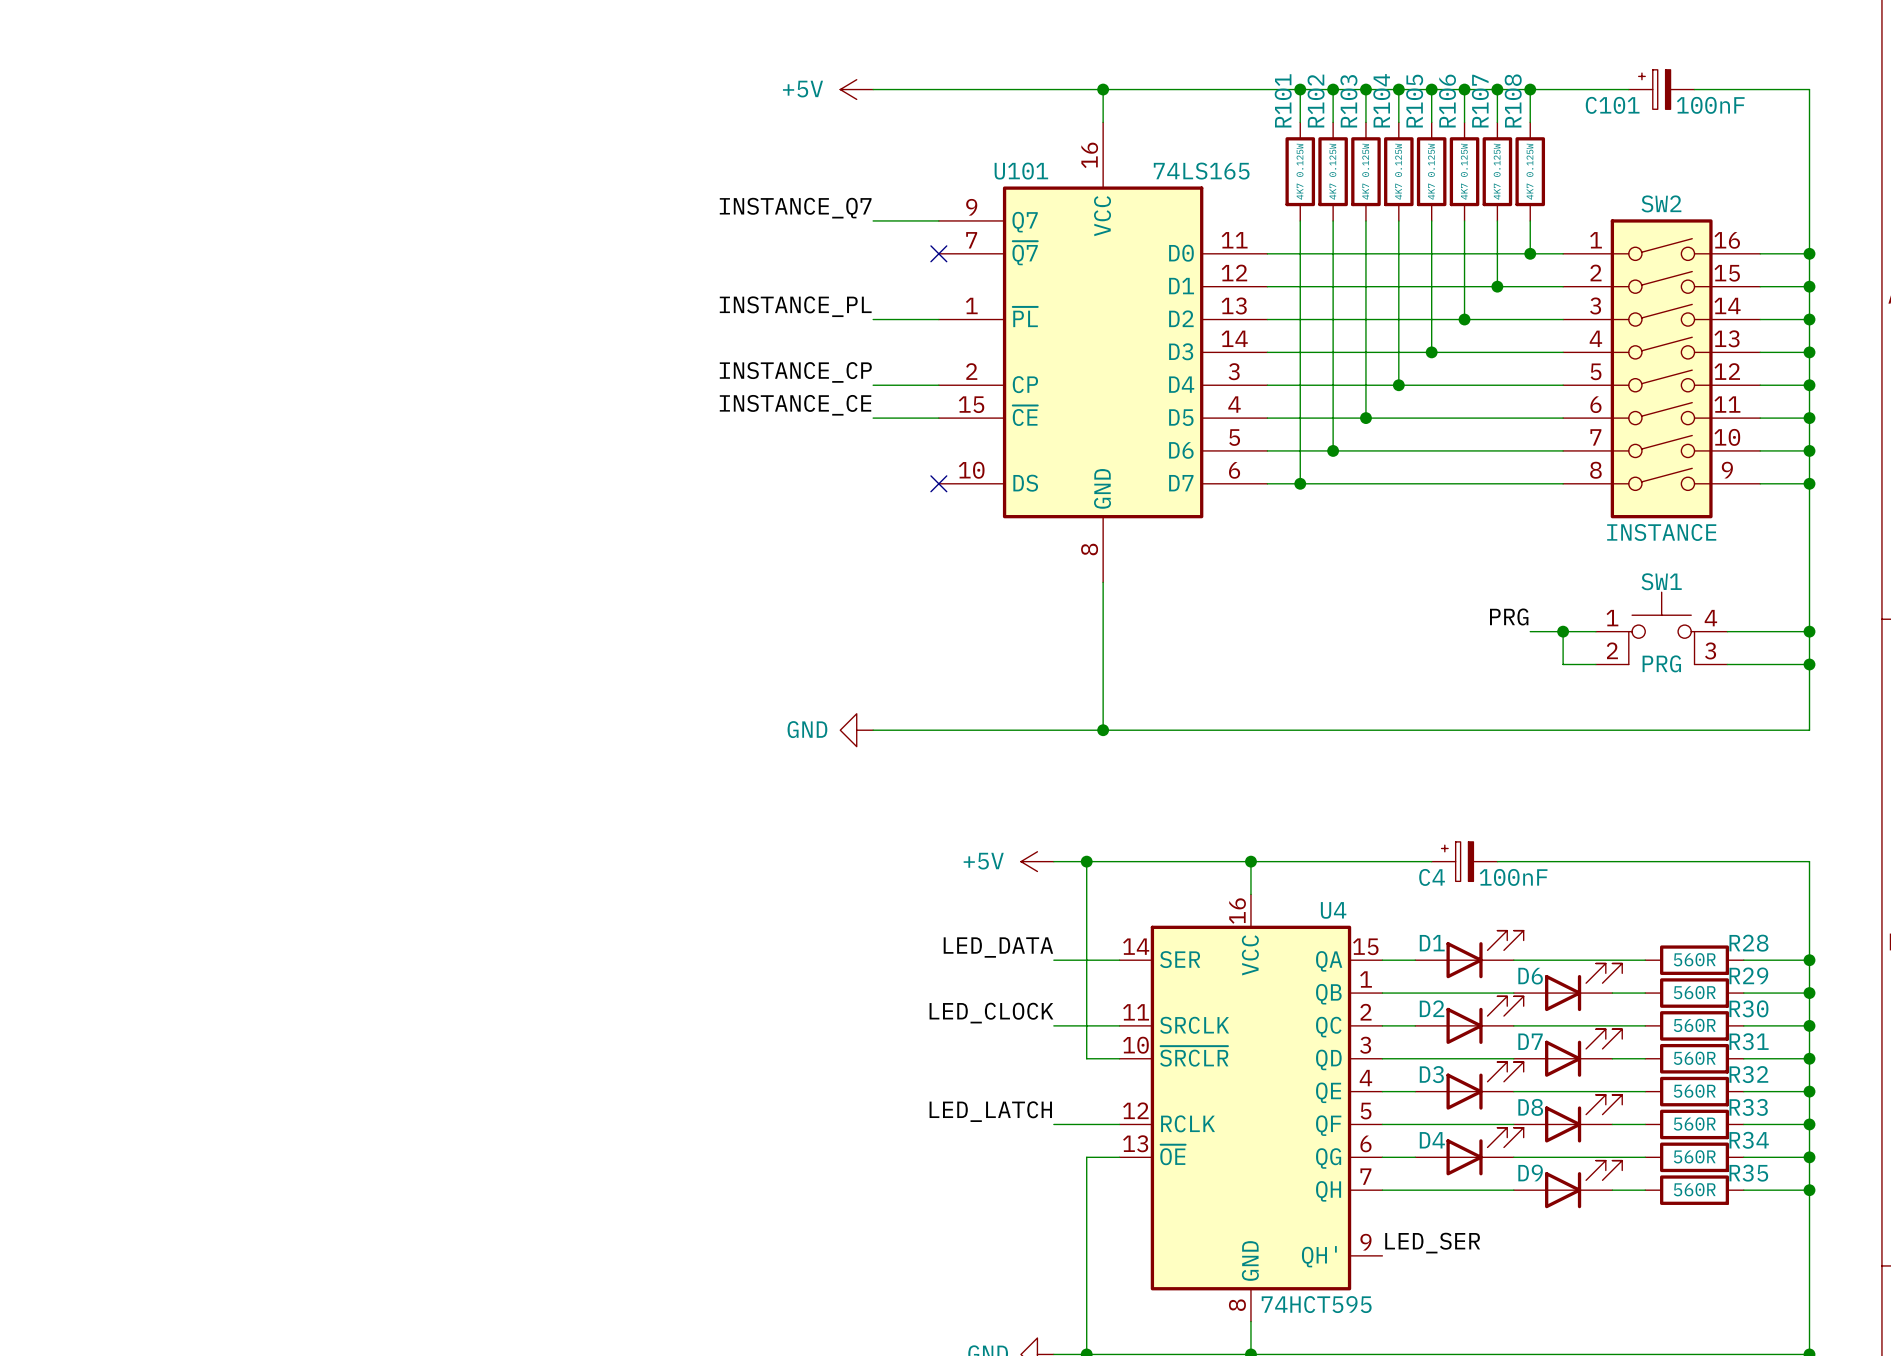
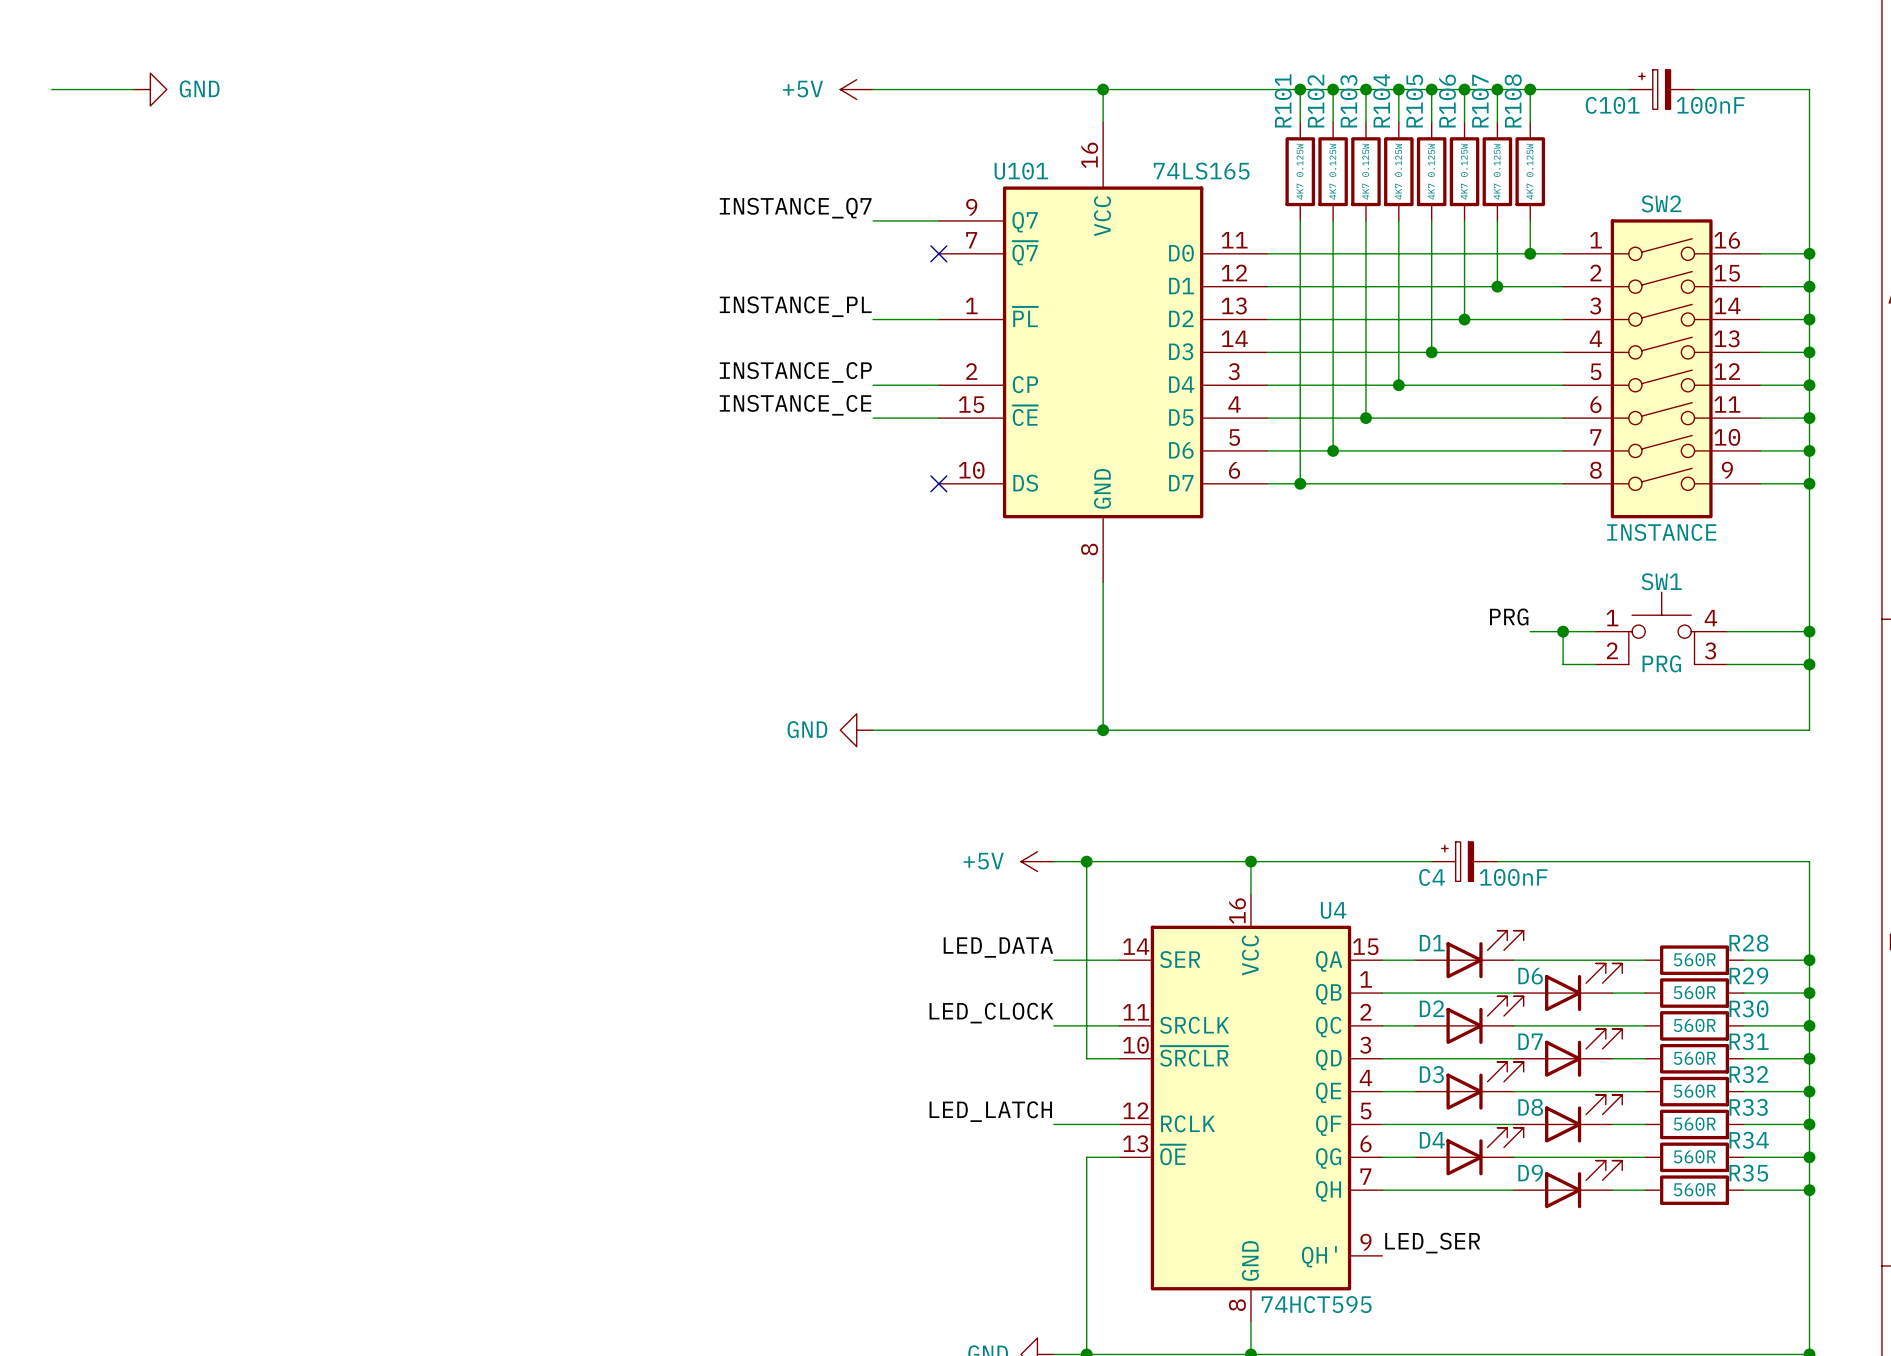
wire: none -> (51, 89) (133, 89)
power symbol: none -> GND (150, 89)

